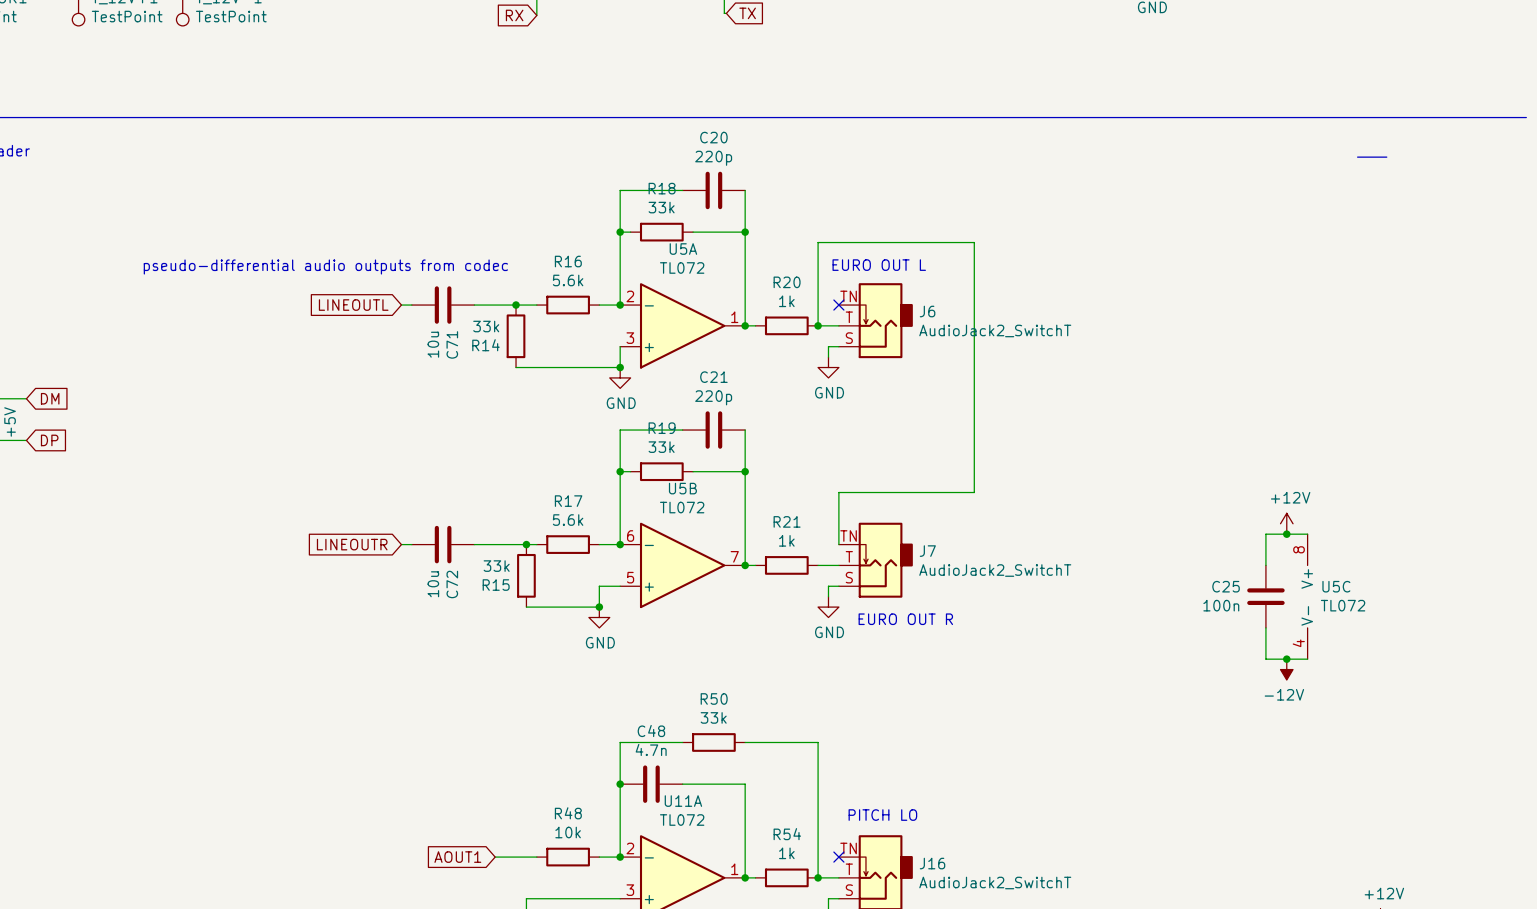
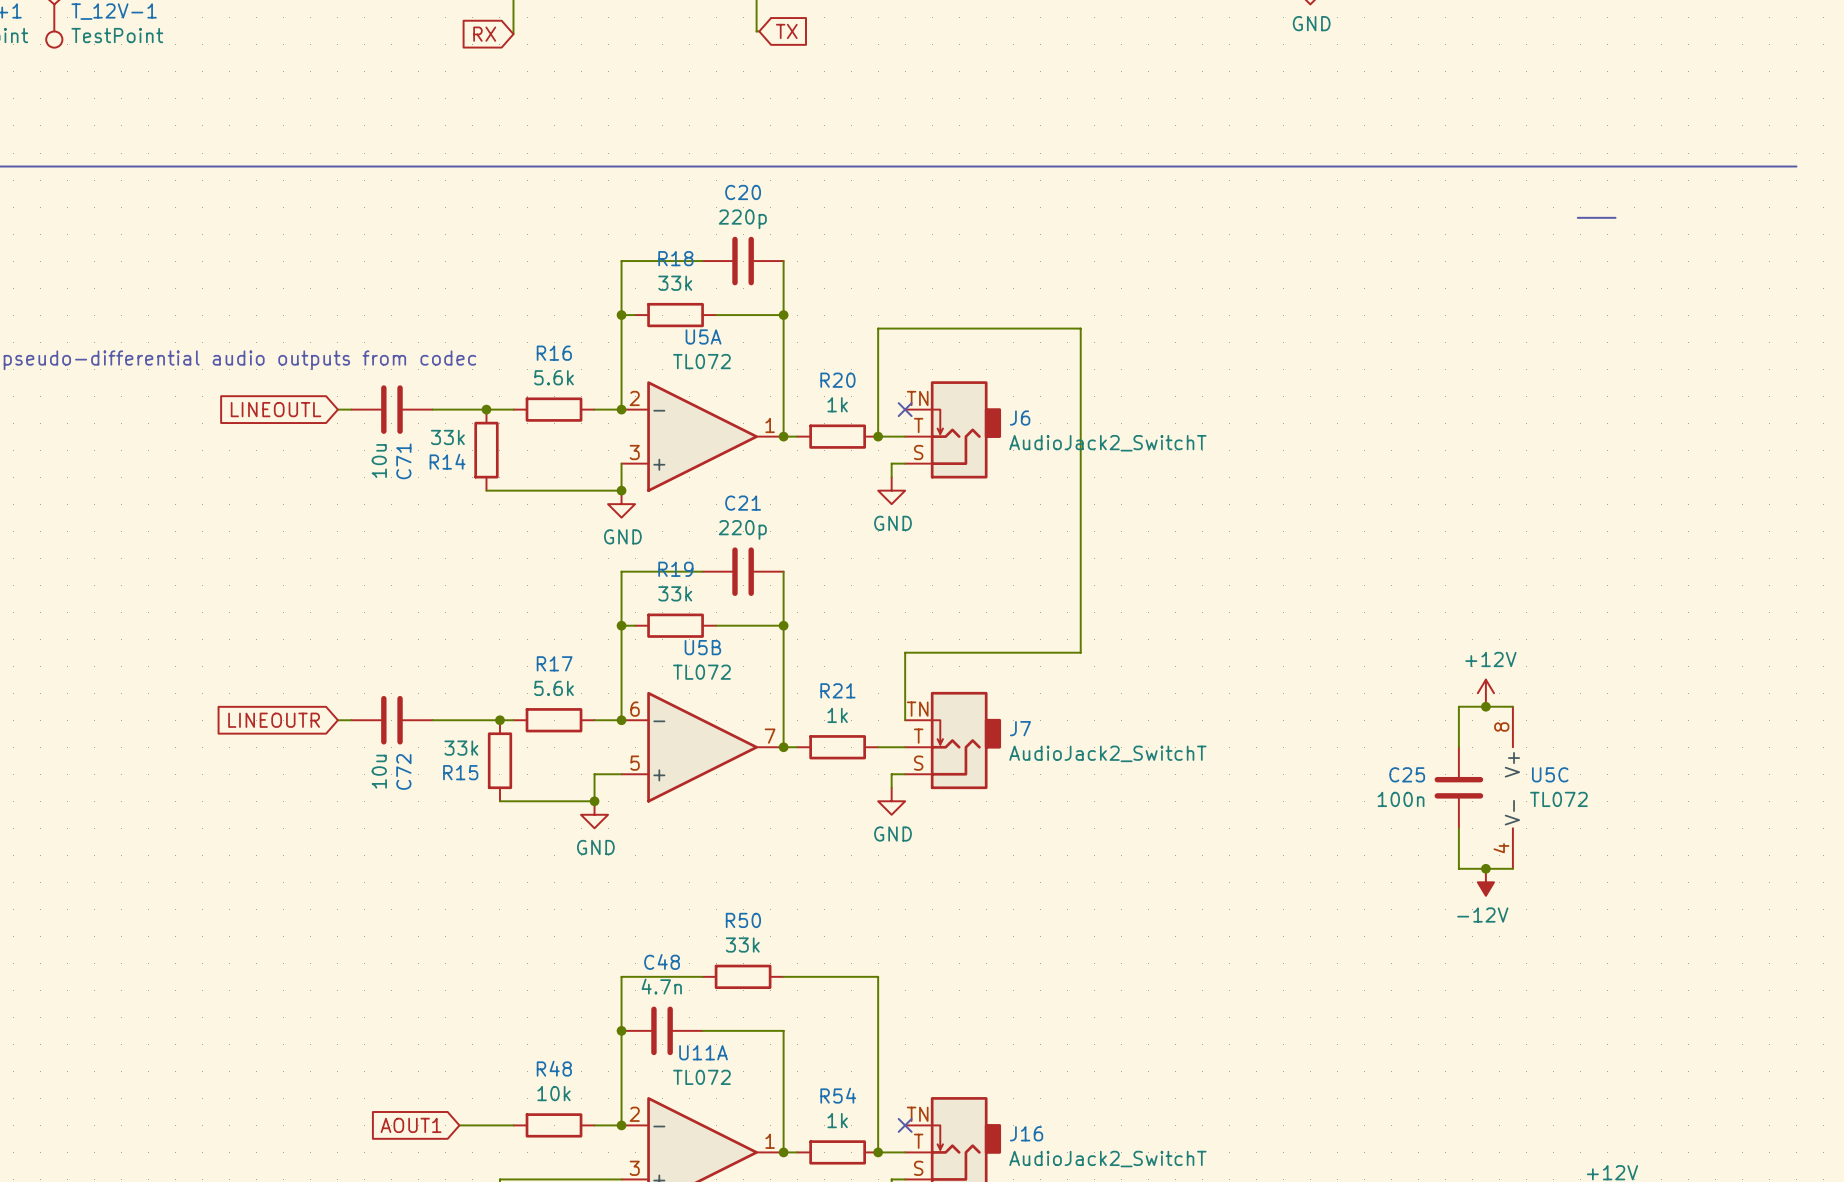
text: EURO OUT L (879, 265) -> none
text: EURO OUT R (905, 619) -> none
text: PITCH LO (882, 815) -> none

